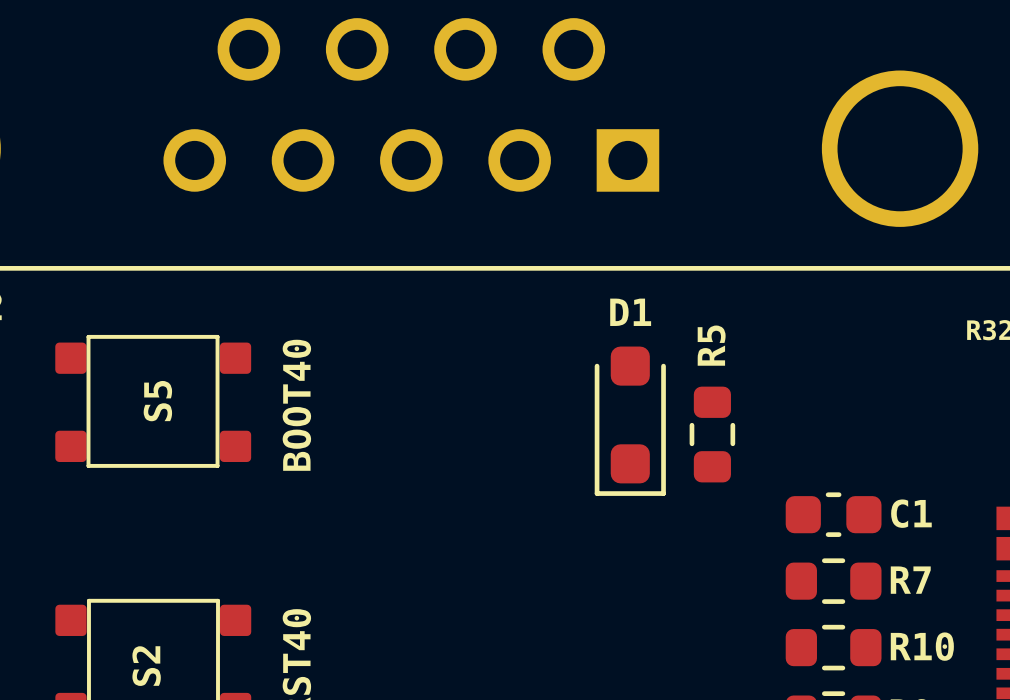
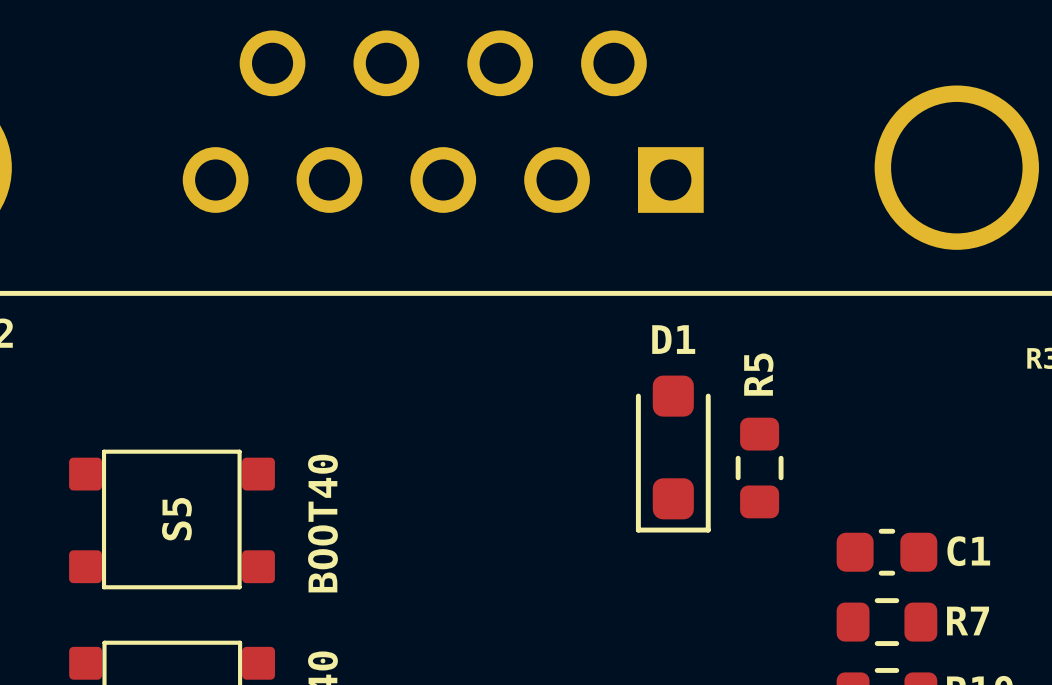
S5 position: (153, 401) -> (172, 519)
text position: BOOT40 (296, 405) -> BOOT40 (322, 523)

